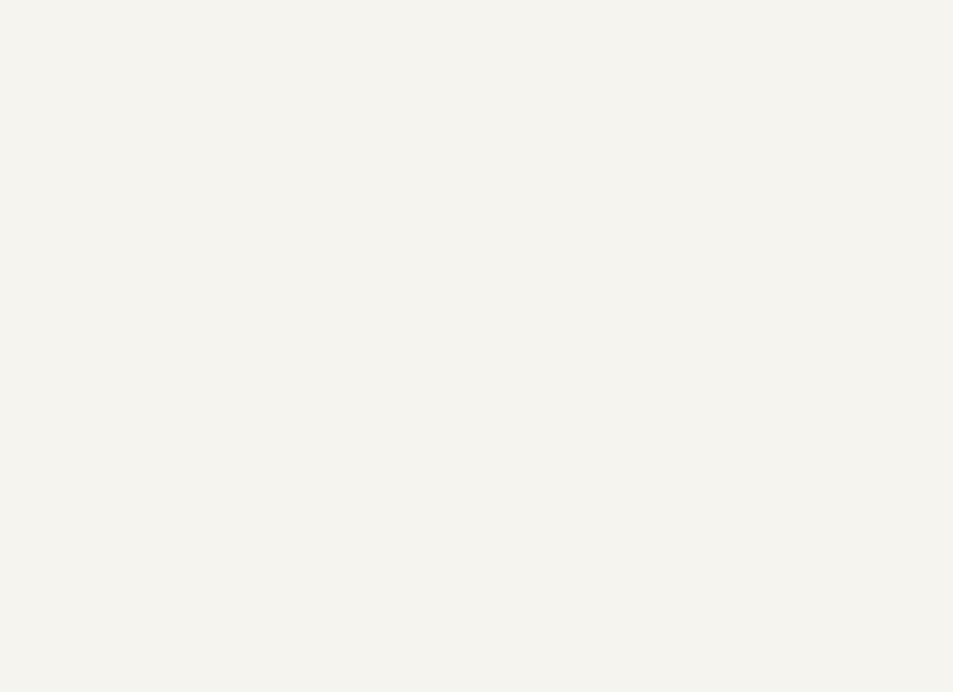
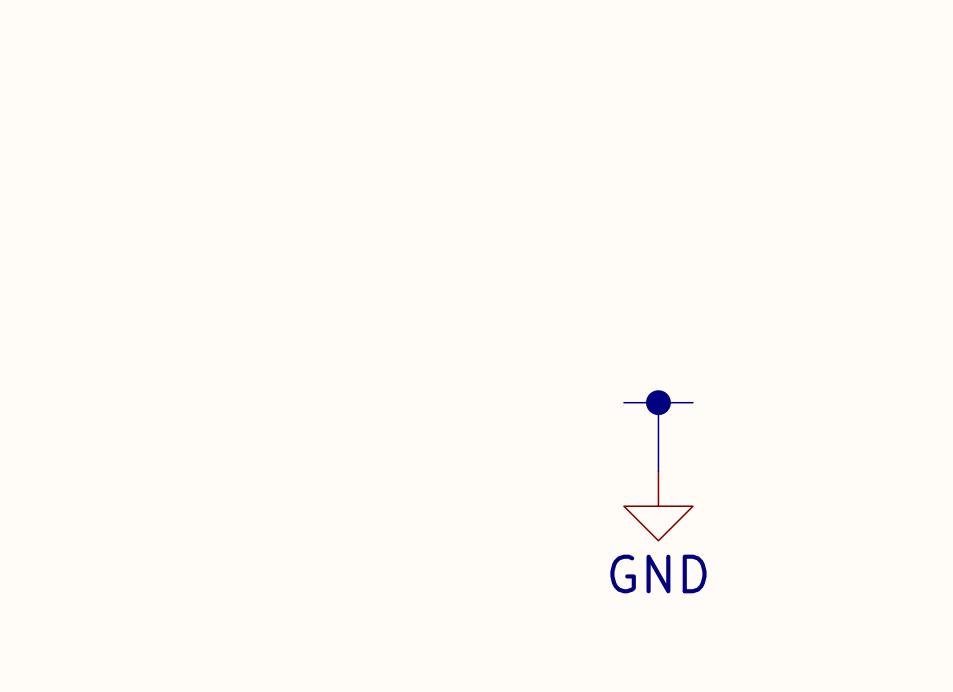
wire: none -> (623, 402) (692, 402)
wire: none -> (658, 402) (658, 471)
junction: none -> (658, 402)
power symbol: none -> GND (658, 506)

